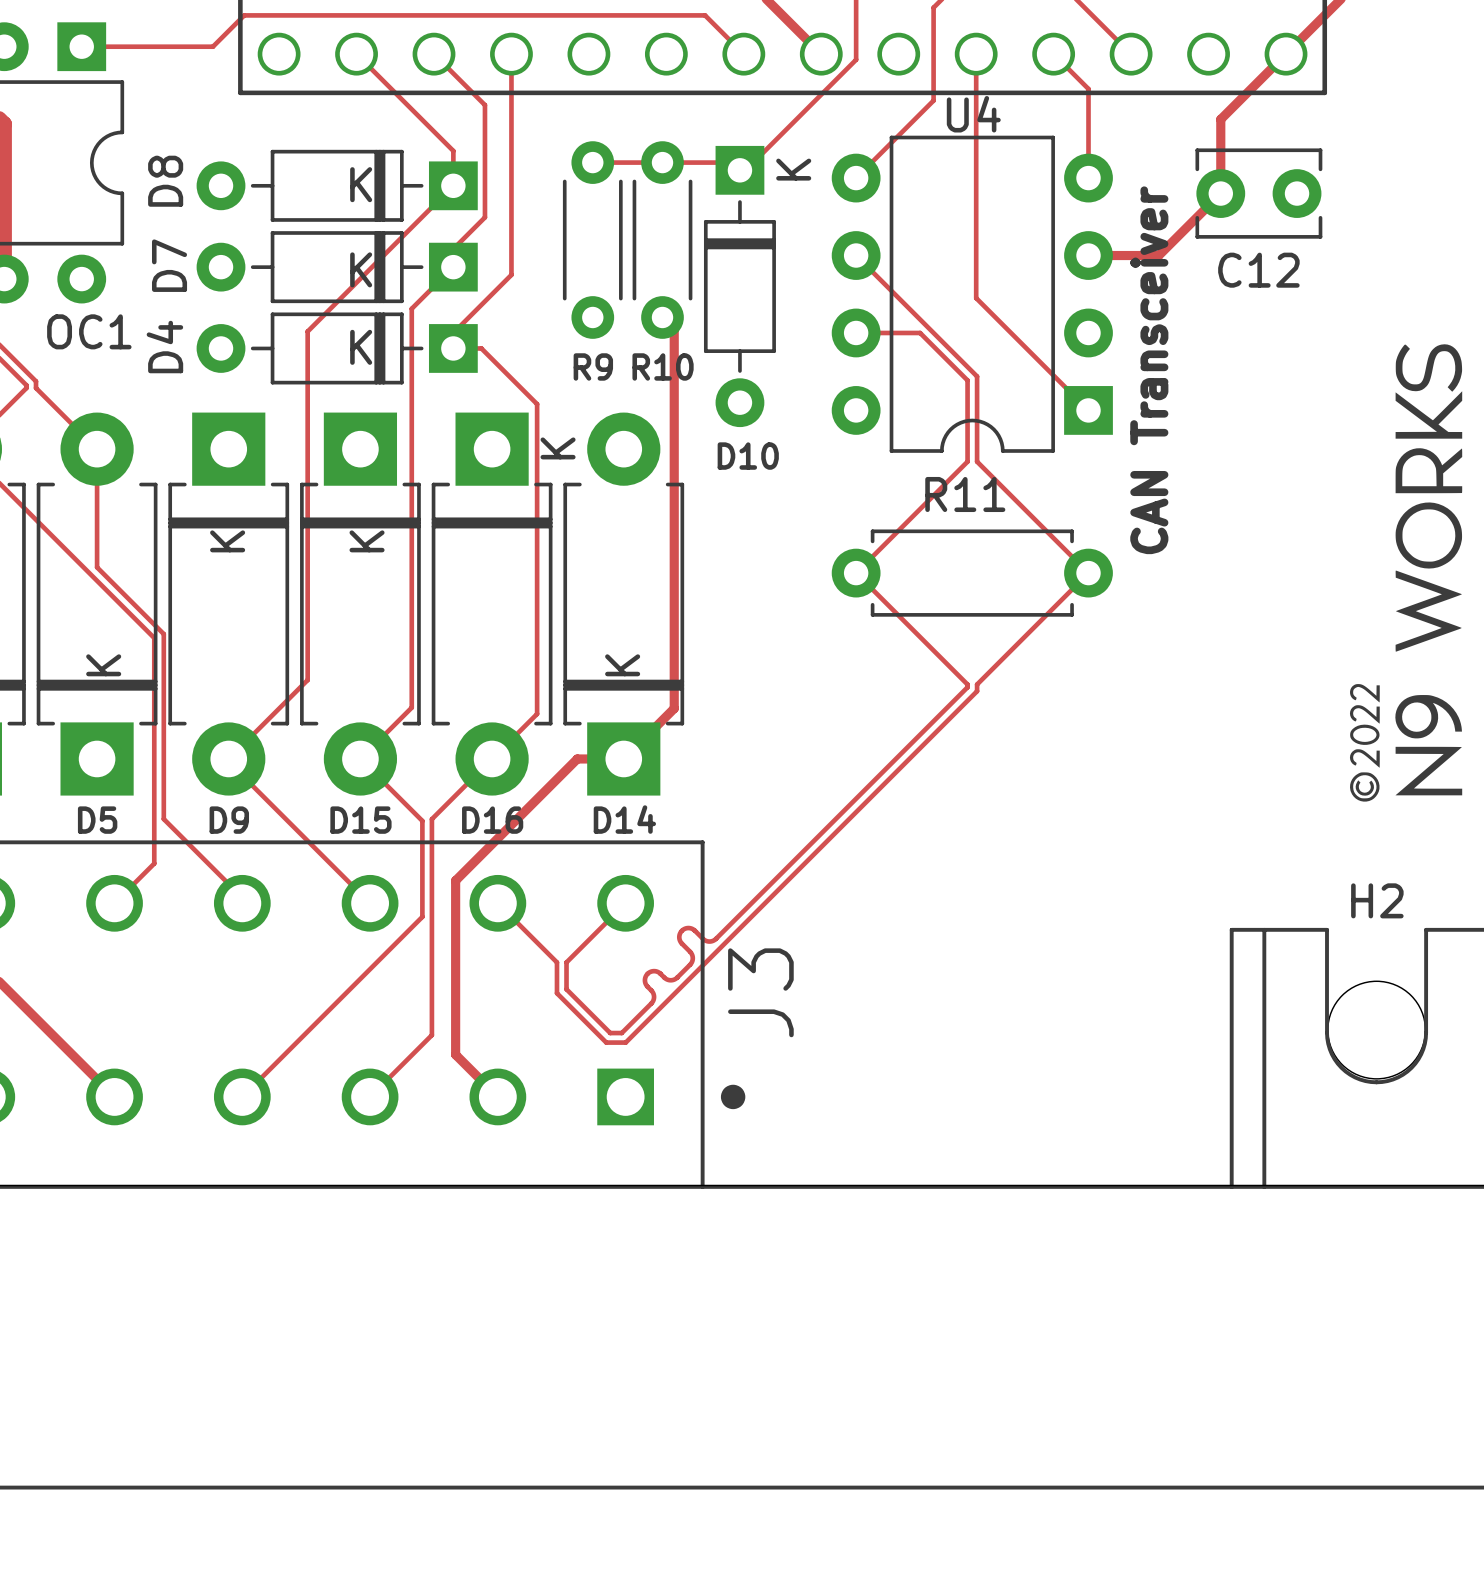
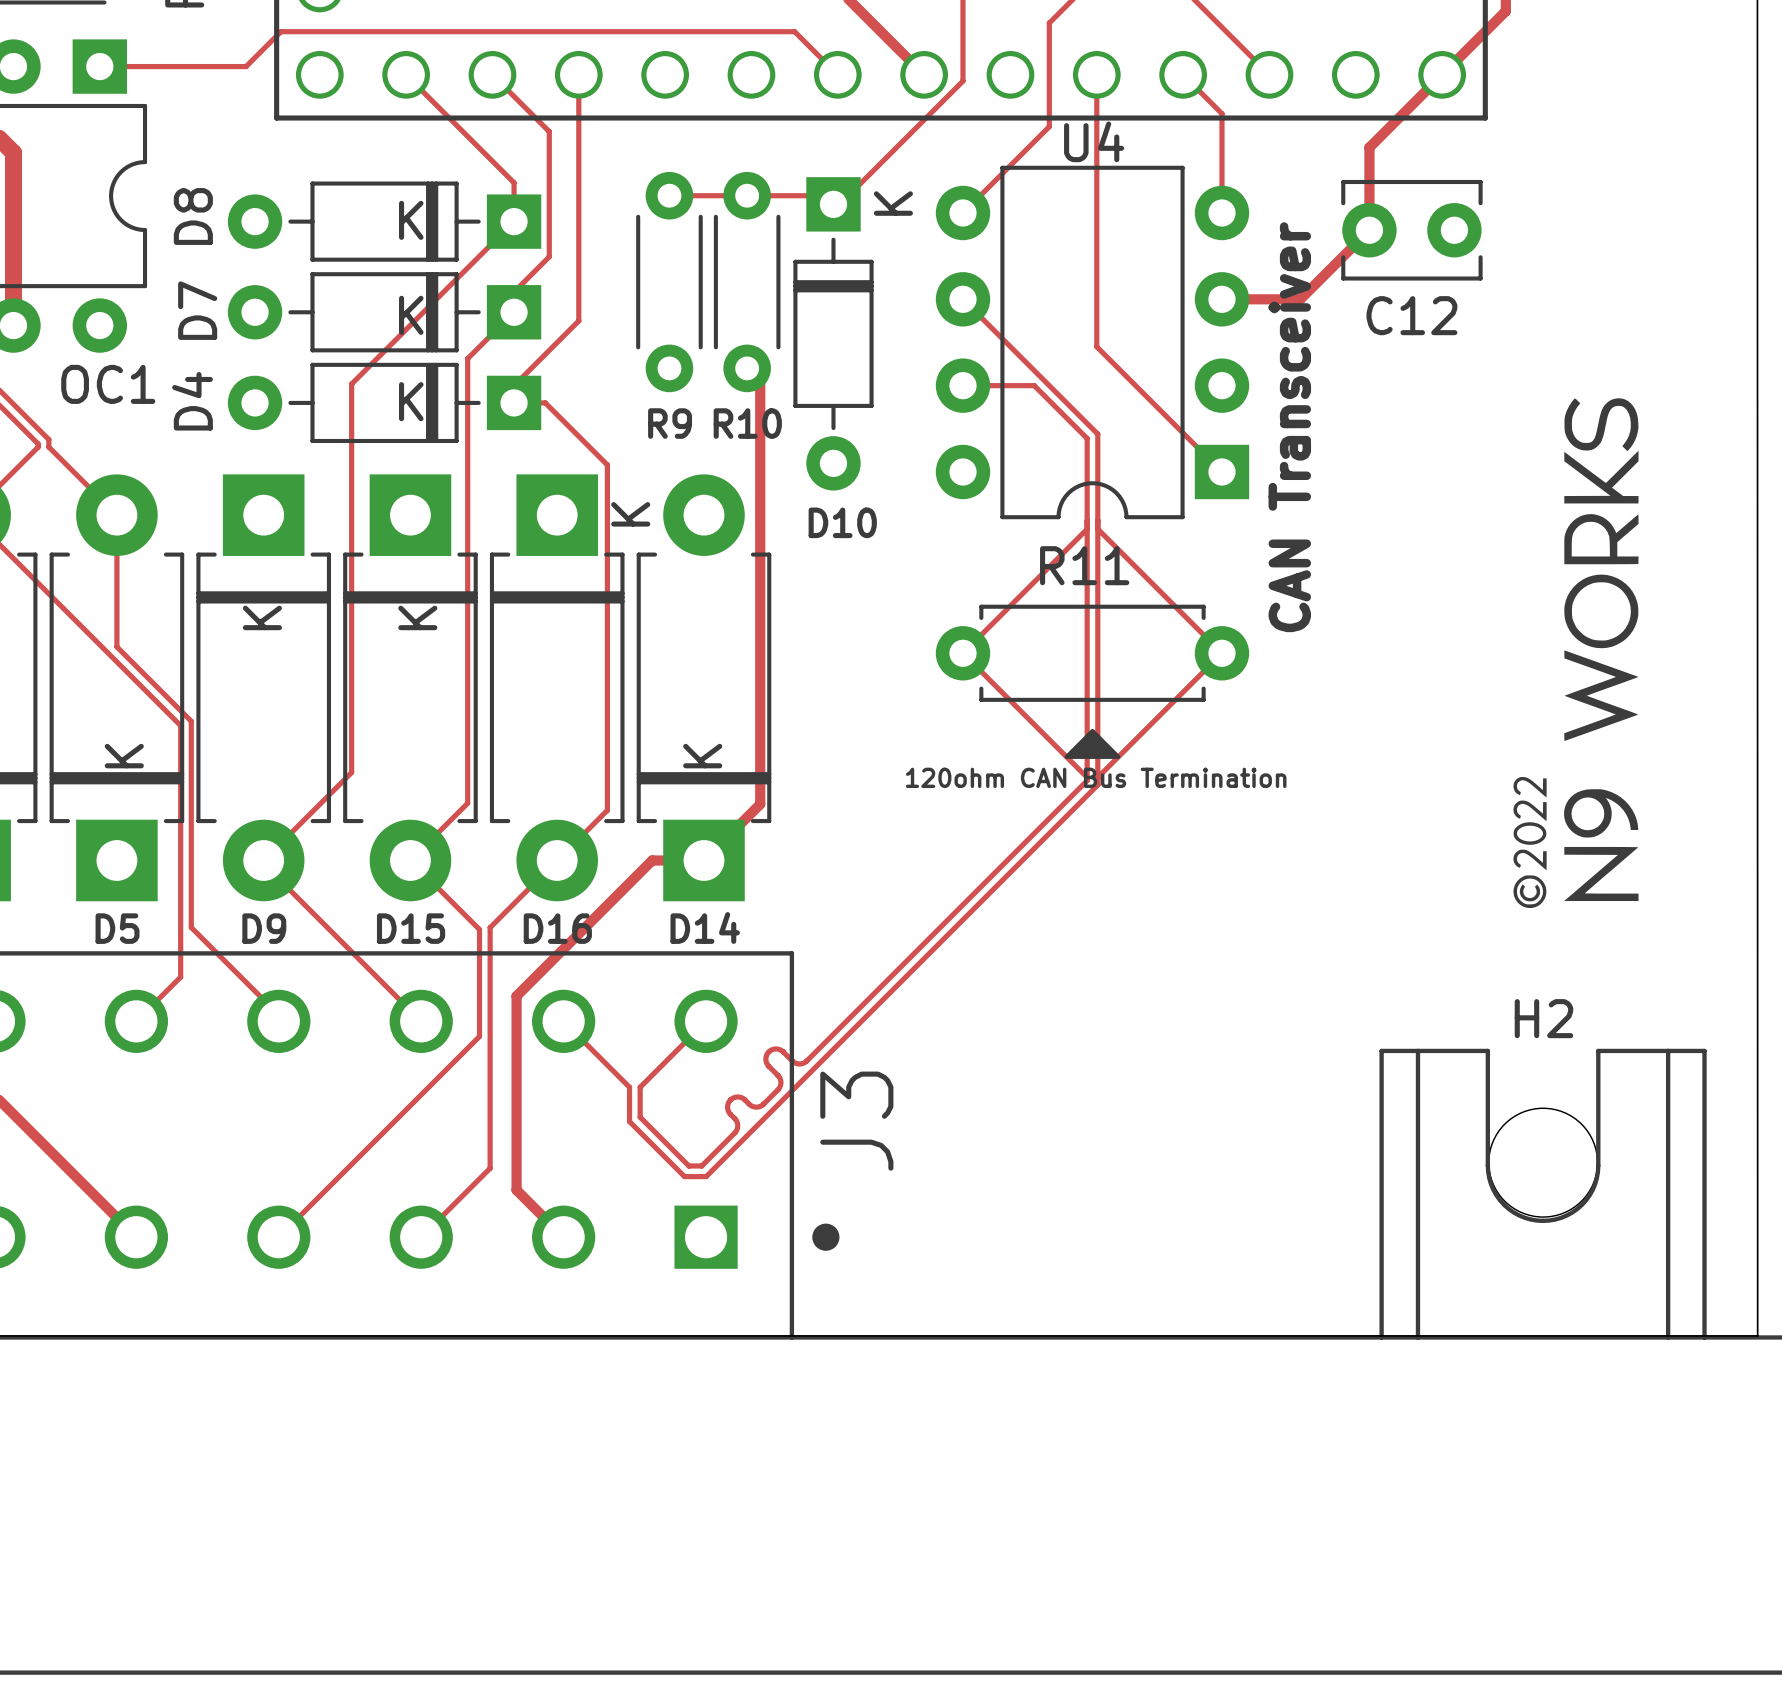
track: none -> (1087, 529) (1087, 777)
track: none -> (1097, 529) (1097, 777)
drawing: none -> [1064, 728, 1121, 759]
text: none -> 120ohm CAN Bus Termination (1096, 777)

